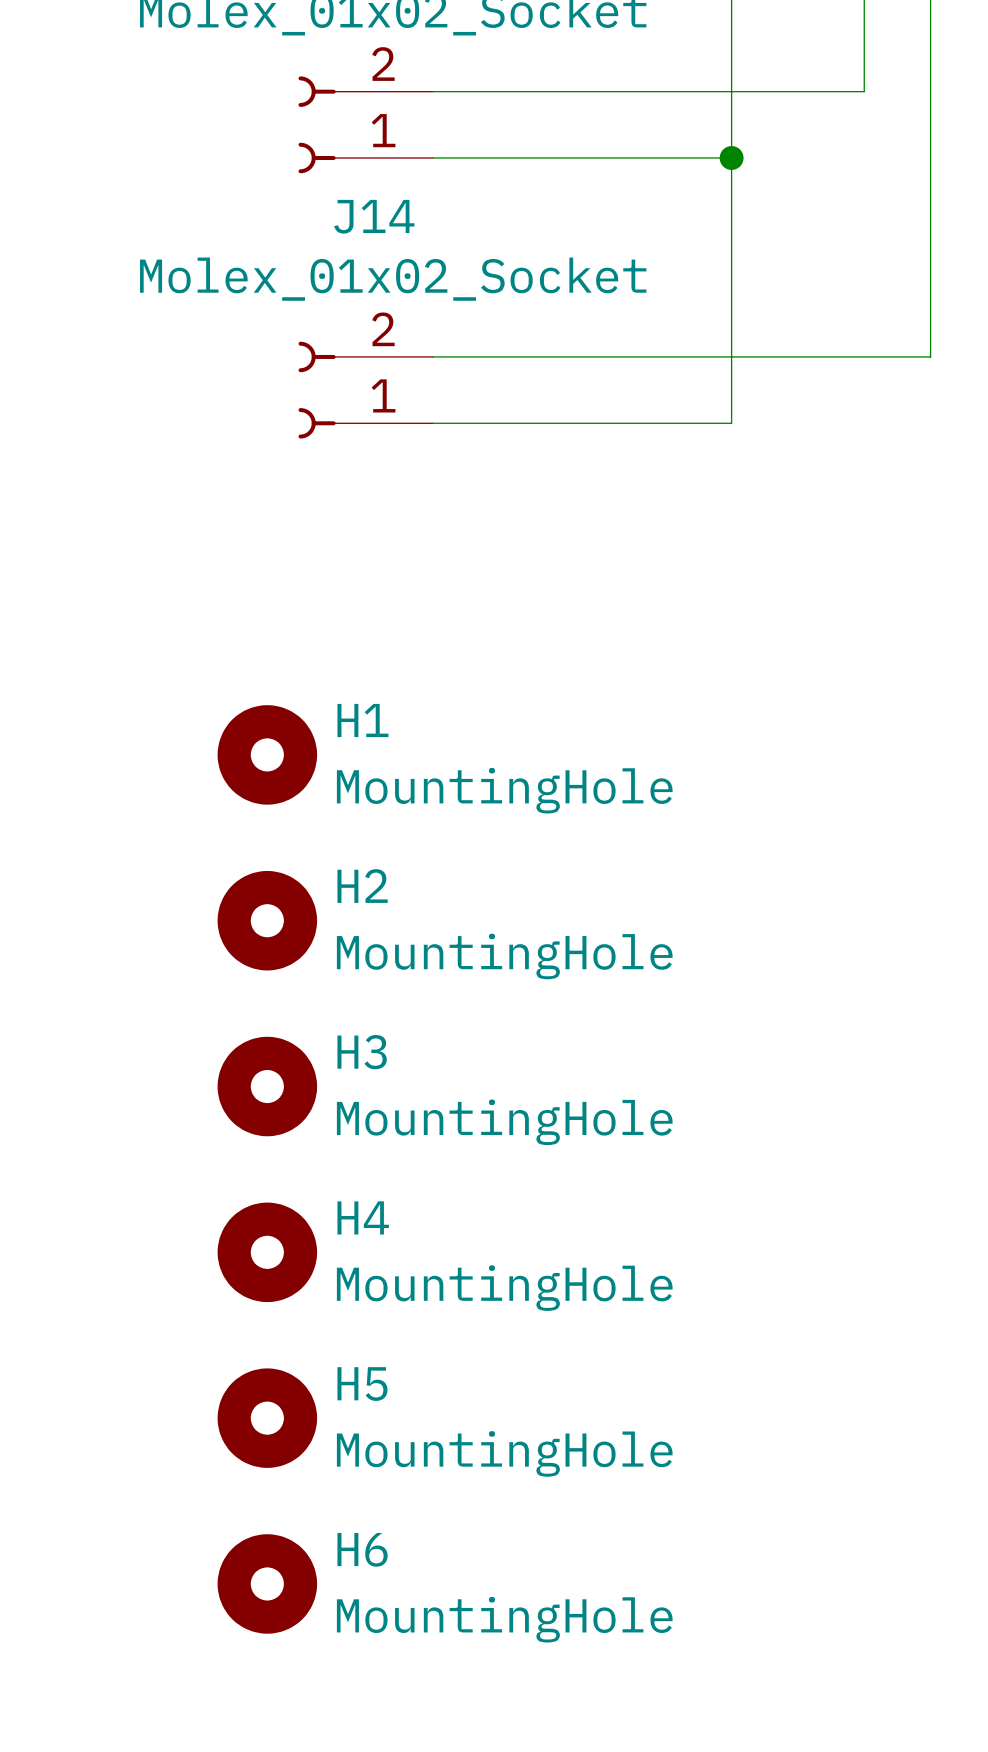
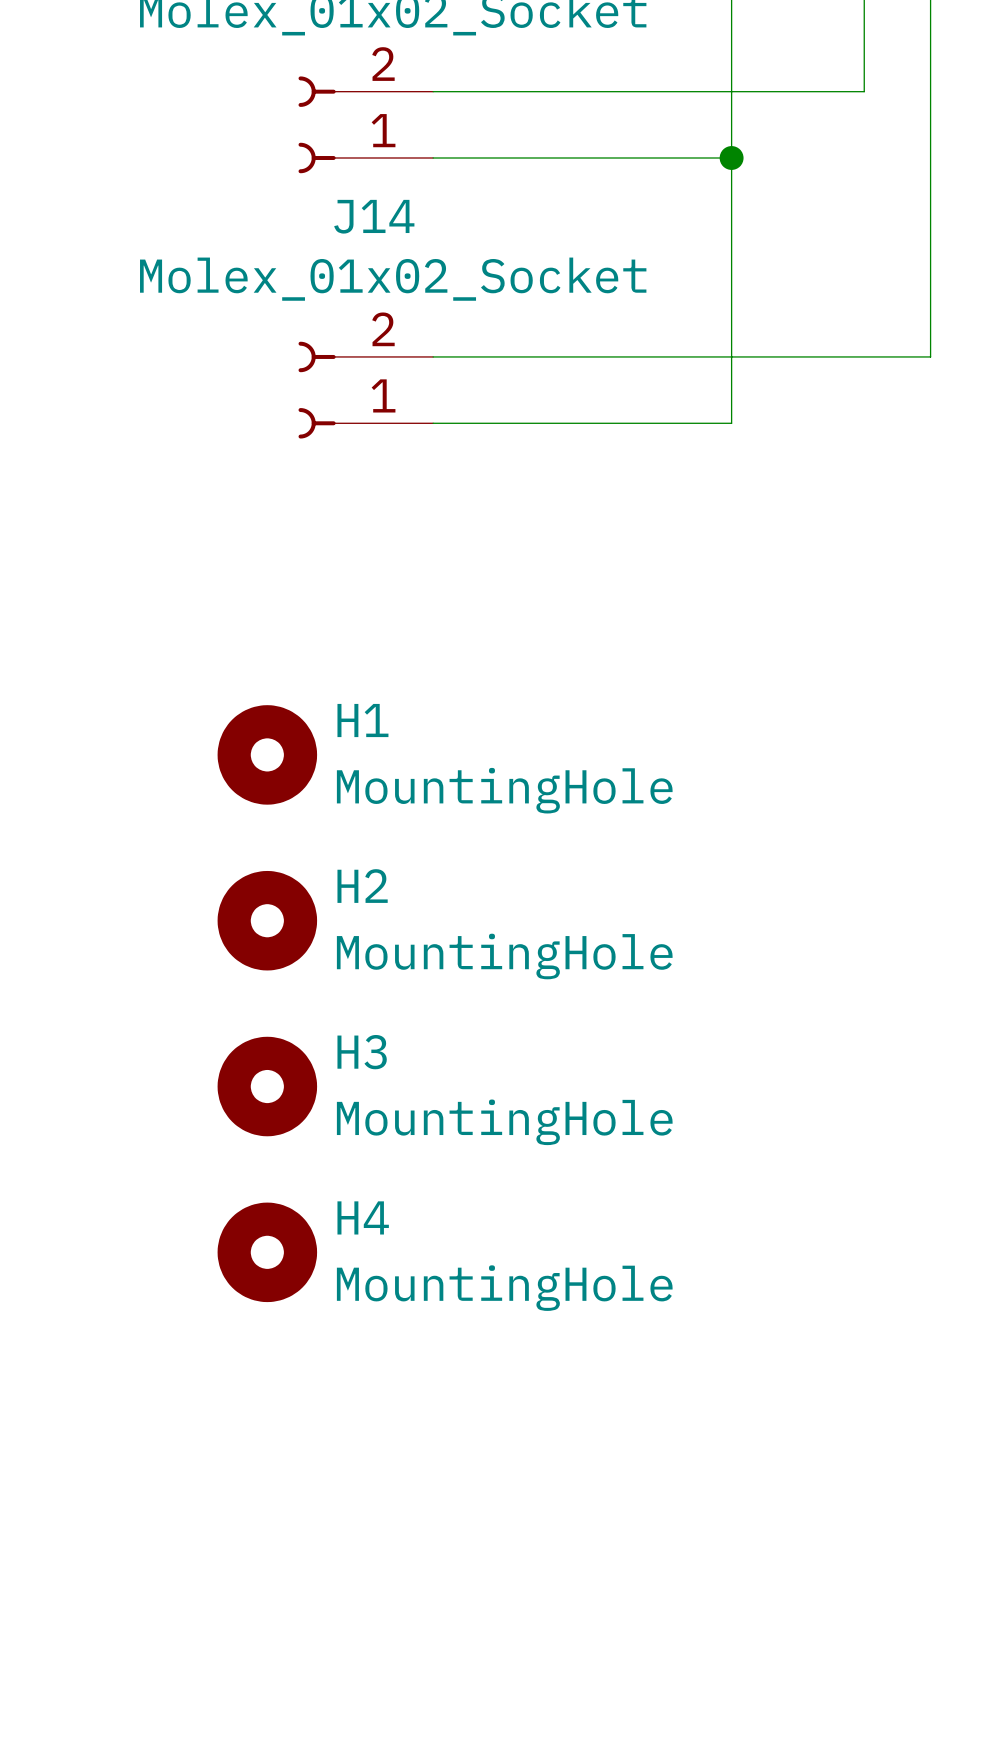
H5: MountingHole (267, 1418) -> none
H6: MountingHole (267, 1583) -> none

